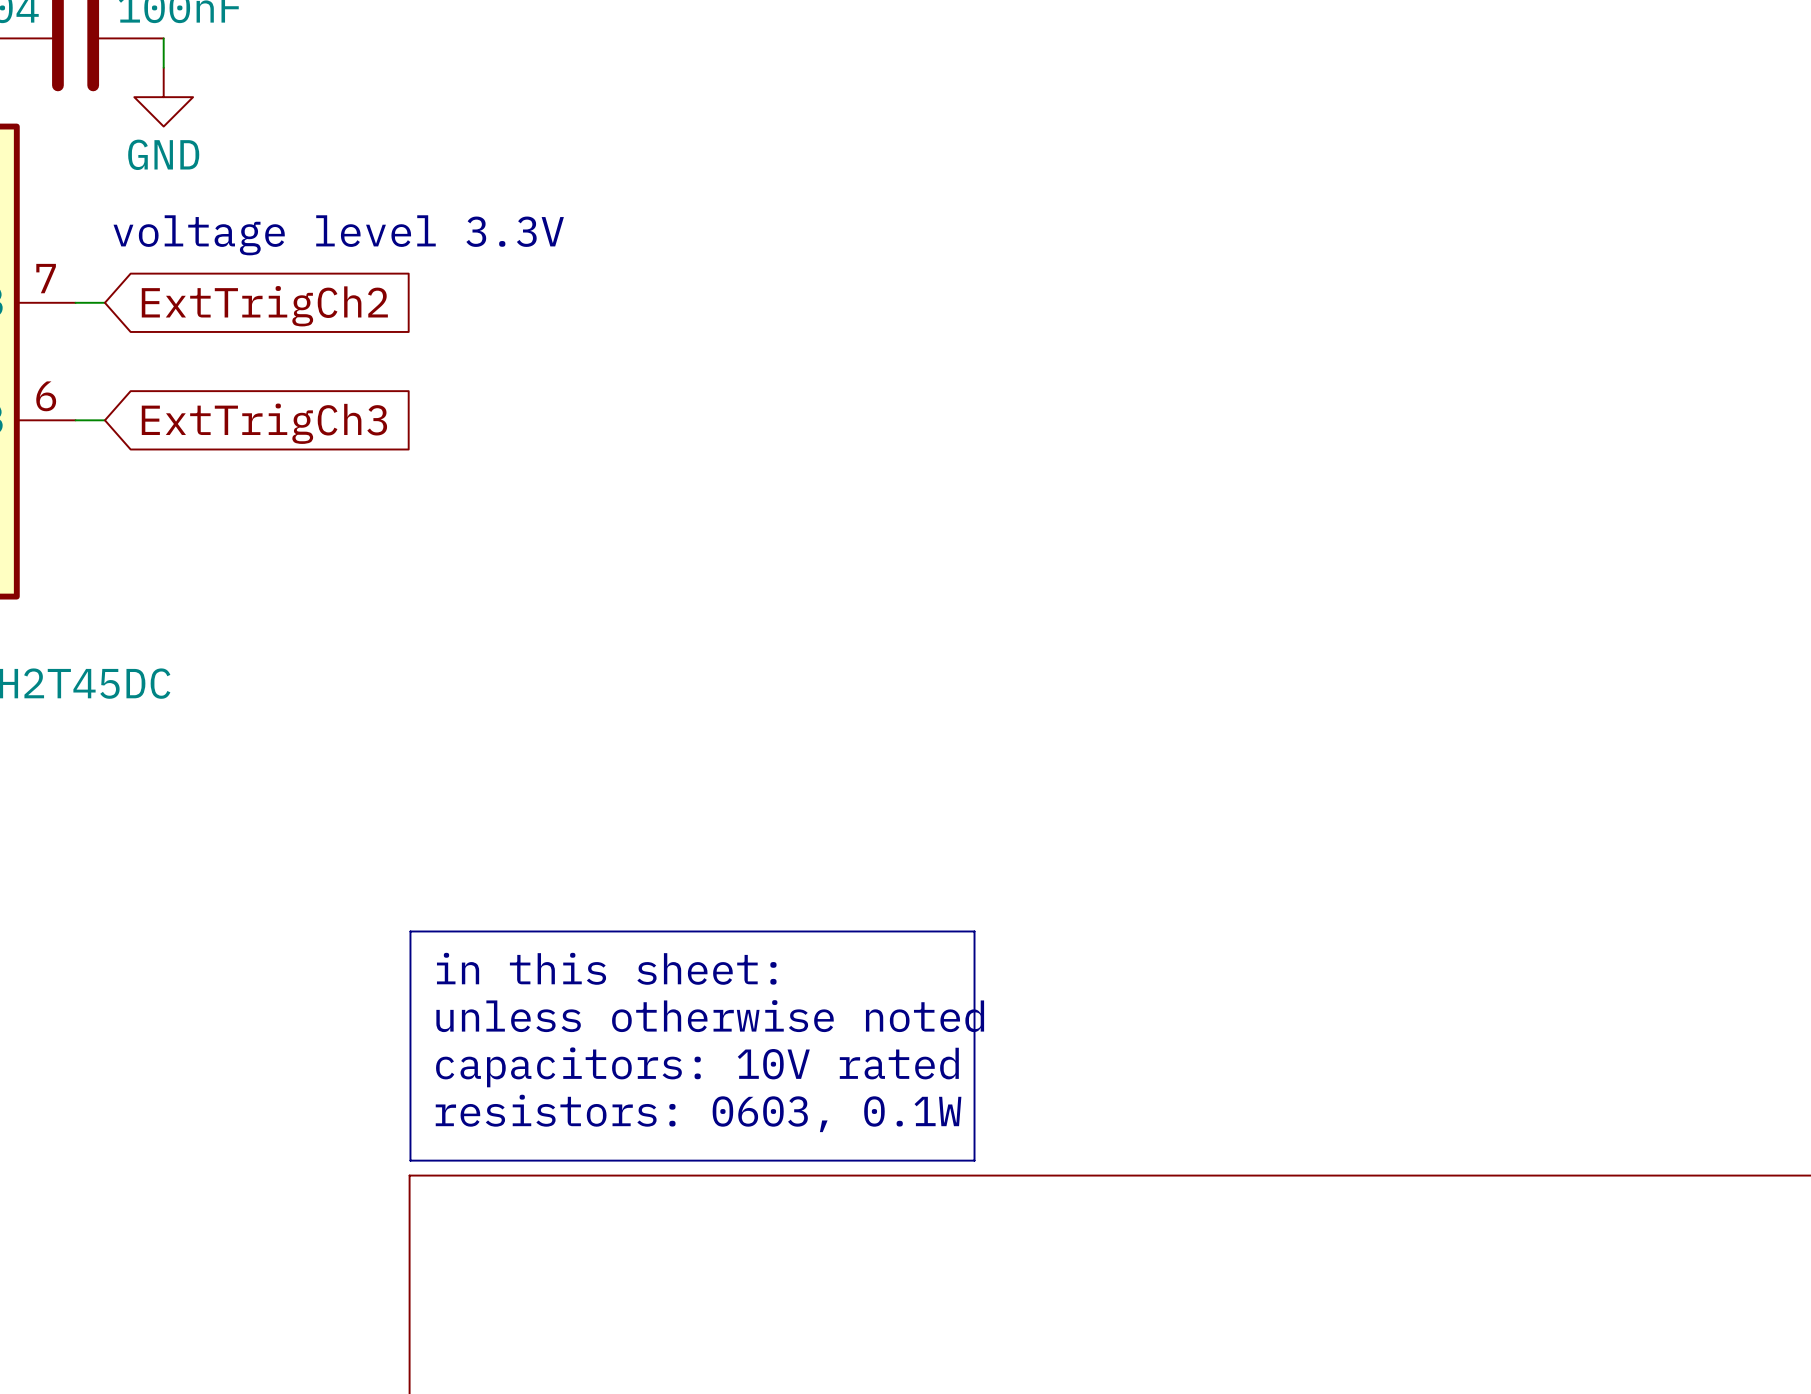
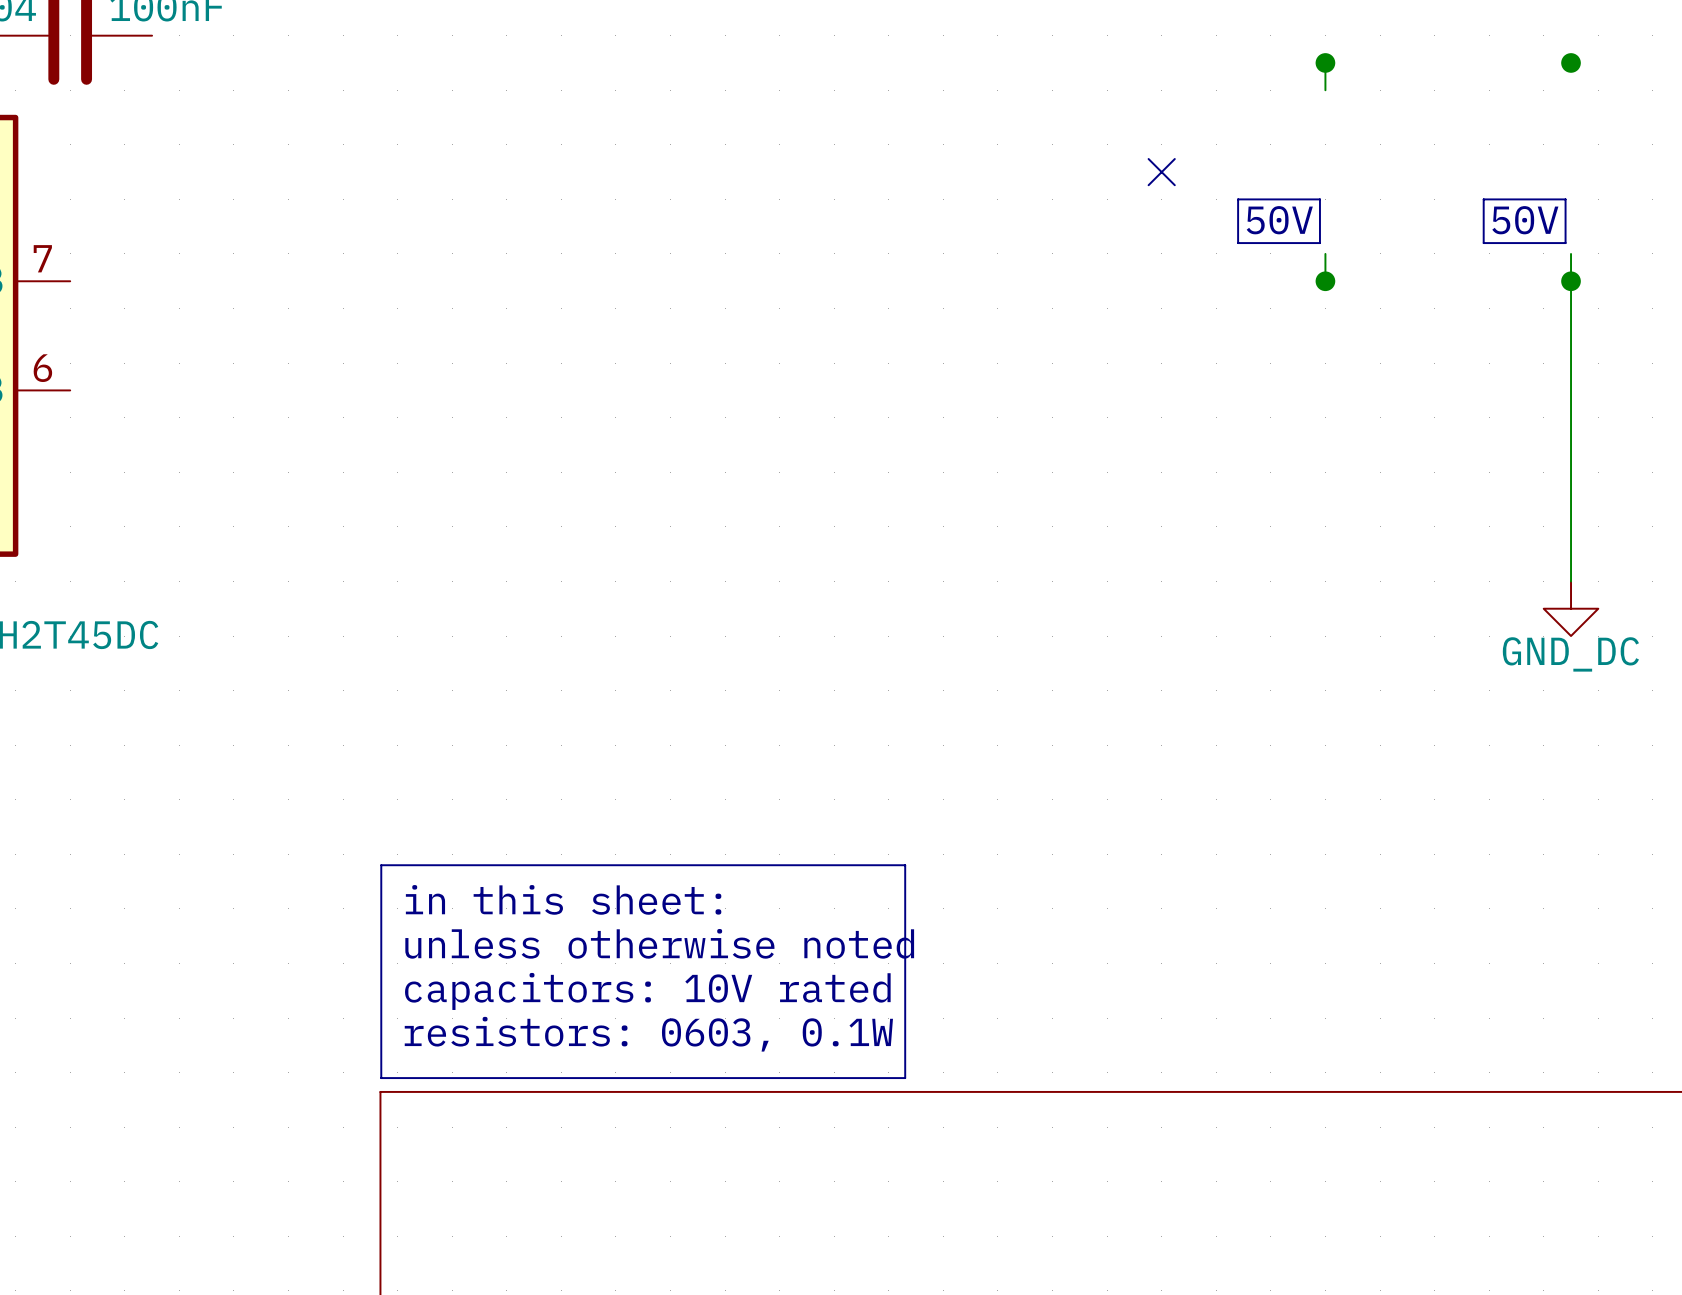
wire: (163, 38) (163, 67) -> none
wire: none -> (1325, 62) (1325, 90)
junction: none -> (1325, 62)
junction: none -> (1571, 62)
power symbol: GND (163, 97) -> none
no-connect mark: none -> (1161, 172)
line: none -> (1238, 199) (1319, 199) (1319, 243) (1238, 243) (1238, 199)
line: none -> (1483, 199) (1565, 199) (1565, 243) (1483, 243) (1483, 199)
text: voltage level 3.3V (338, 235) -> none
text: none -> 50V (1279, 220)
text: none -> 50V (1525, 220)
wire: none -> (1325, 253) (1325, 281)
wire: none -> (1571, 253) (1571, 581)
wire: (75, 302) (104, 302) -> none
junction: none -> (1325, 281)
junction: none -> (1571, 281)
global label: ExtTrigCh2 (264, 306) -> none
wire: (75, 420) (104, 420) -> none
global label: ExtTrigCh3 (264, 423) -> none
power symbol: none -> GND_DC (1571, 608)

